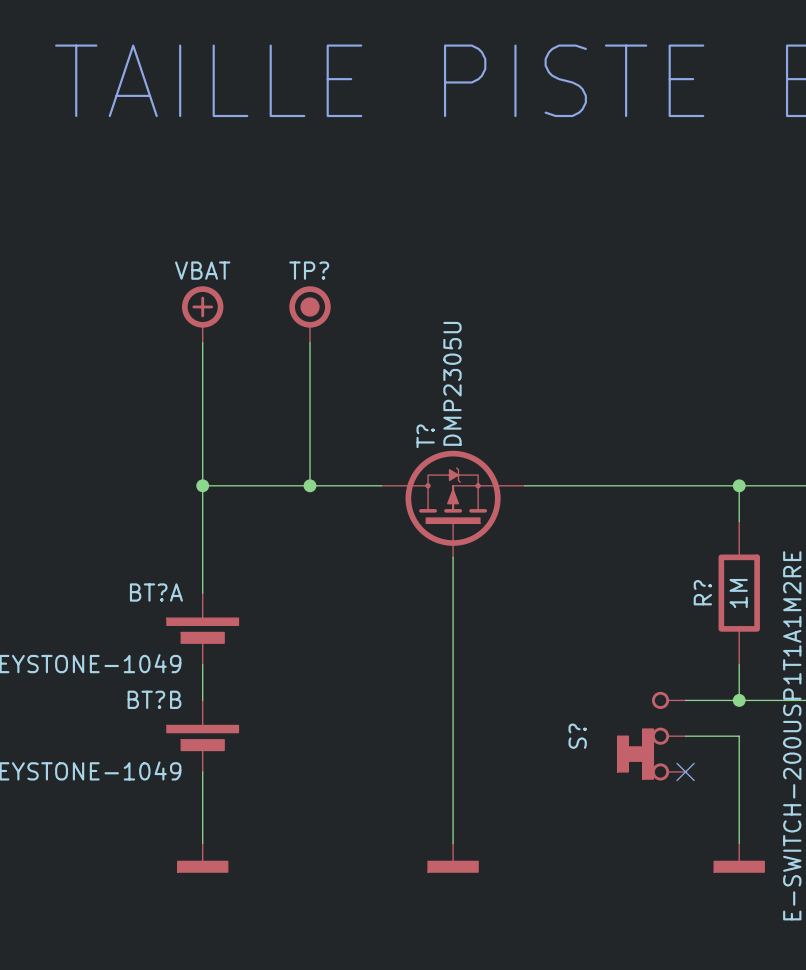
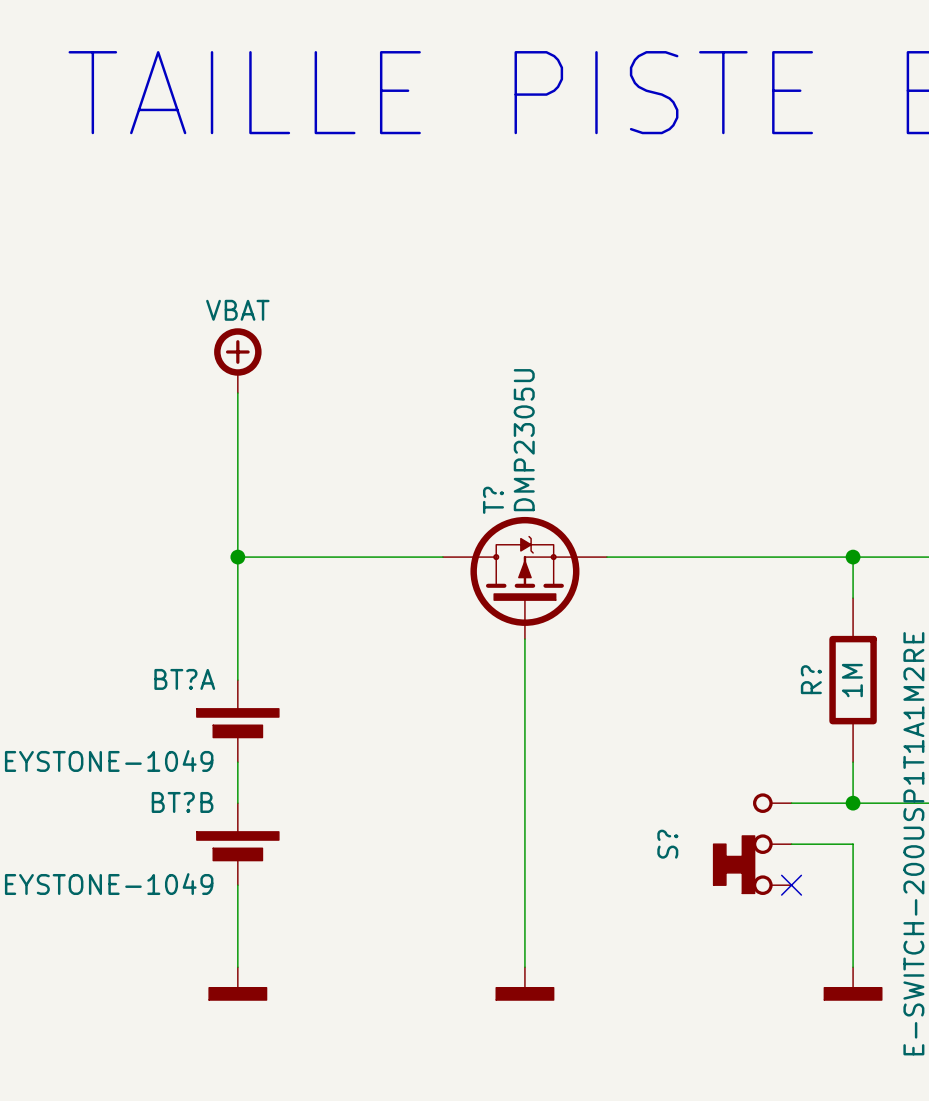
TP?: (310, 314) -> none
wire: (310, 342) (310, 485) -> none
junction: (310, 485) -> none

